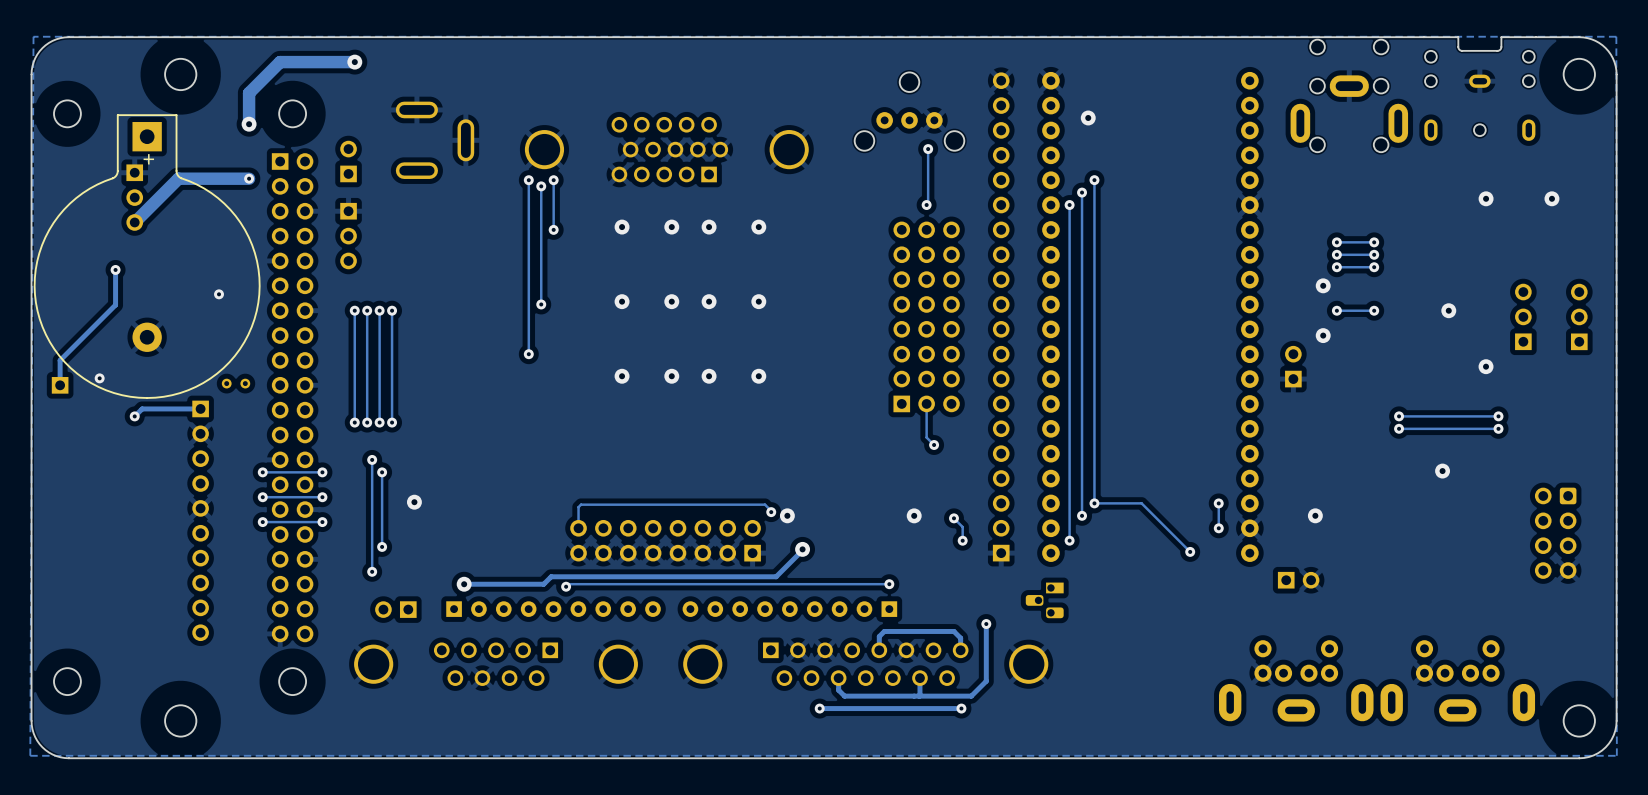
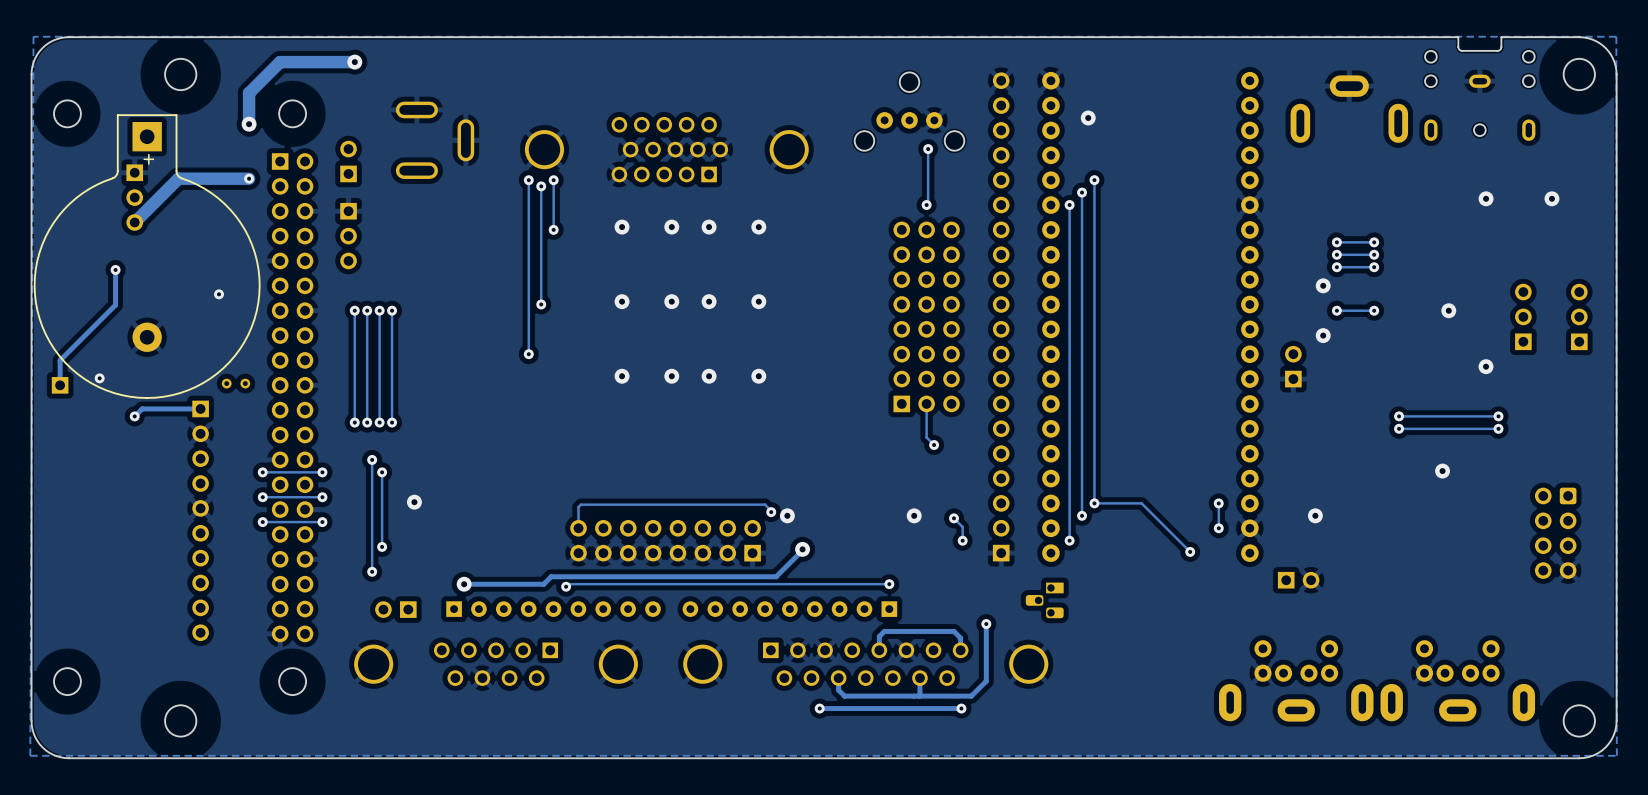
part: (1349, 95) -> none
part: none -> (1349, 109)

